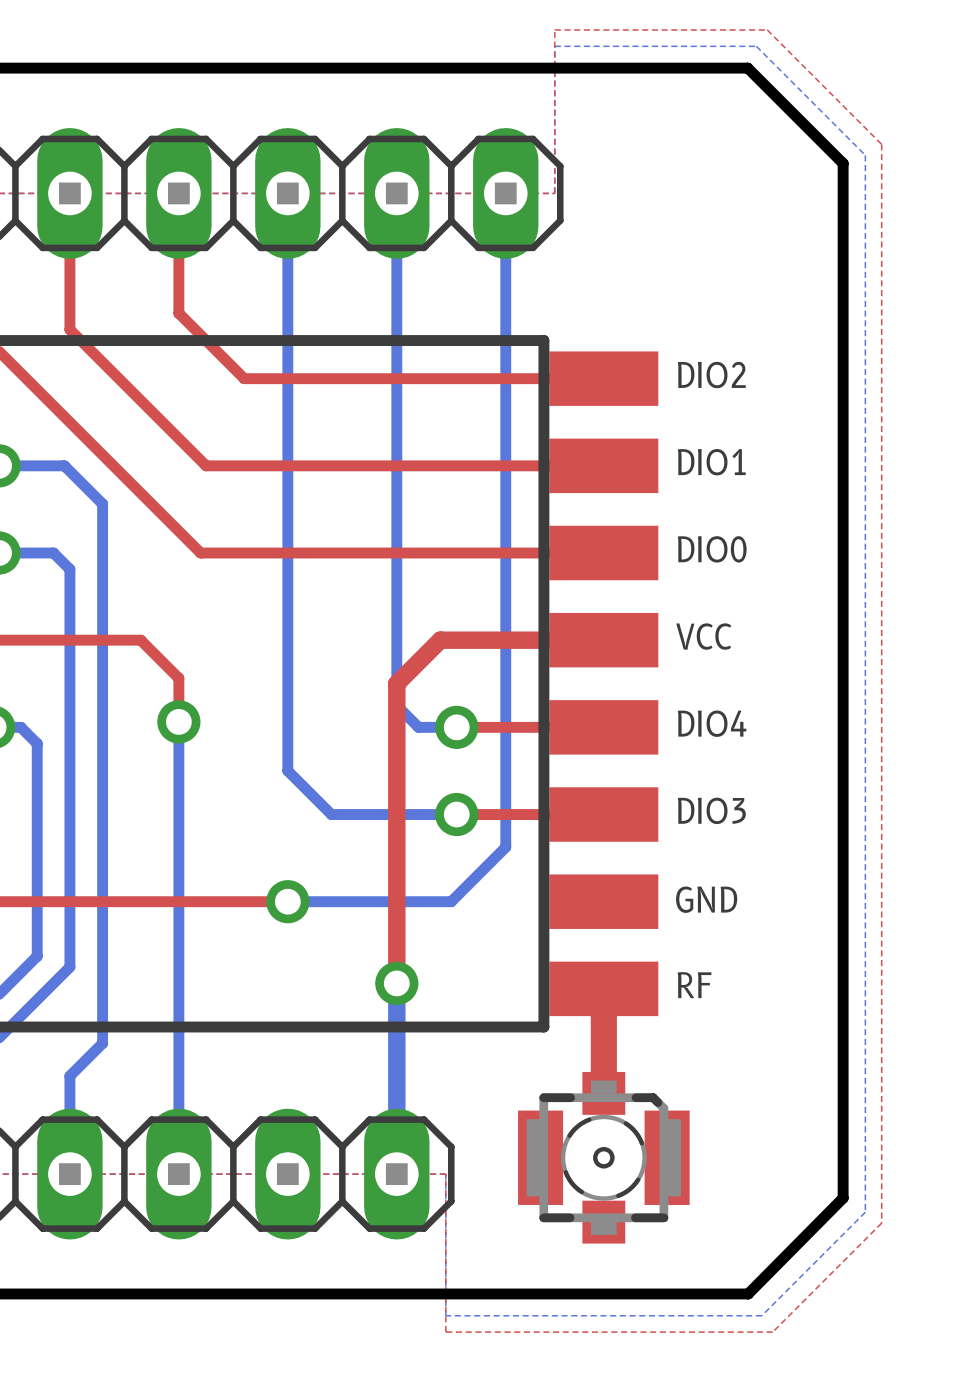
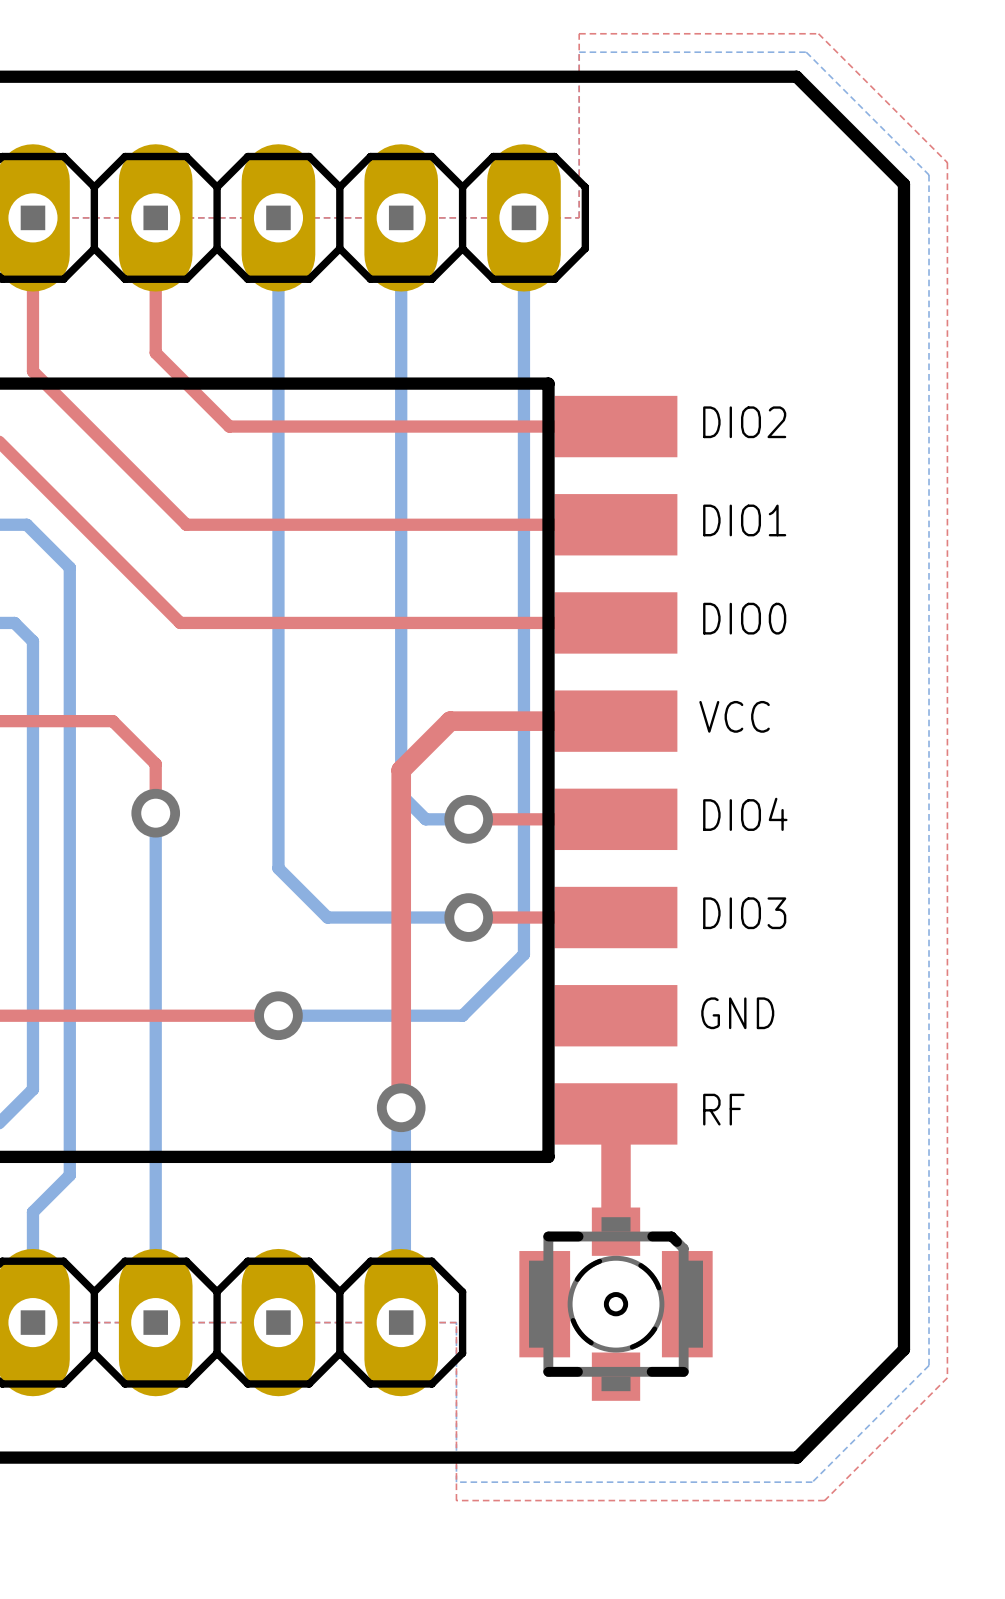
line: (527, 340) (543, 340) (543, 1027) (527, 1027) -> (548, 383) (548, 1156)
DIO2 position: (603, 378) -> (616, 426)
DIO1 position: (603, 465) -> (616, 524)
DIO0 position: (603, 553) -> (616, 622)
VCC position: (603, 640) -> (616, 721)
DIO4 position: (603, 727) -> (616, 819)
DIO3 position: (603, 814) -> (616, 917)
text position: GND (706, 899) -> GND (737, 1013)
part position: (603, 901) -> (616, 1015)
top track: (603, 988) (603, 1093) -> (616, 1113) (616, 1231)
RF position: (603, 988) -> (616, 1113)
part position: (603, 1157) -> (616, 1304)

